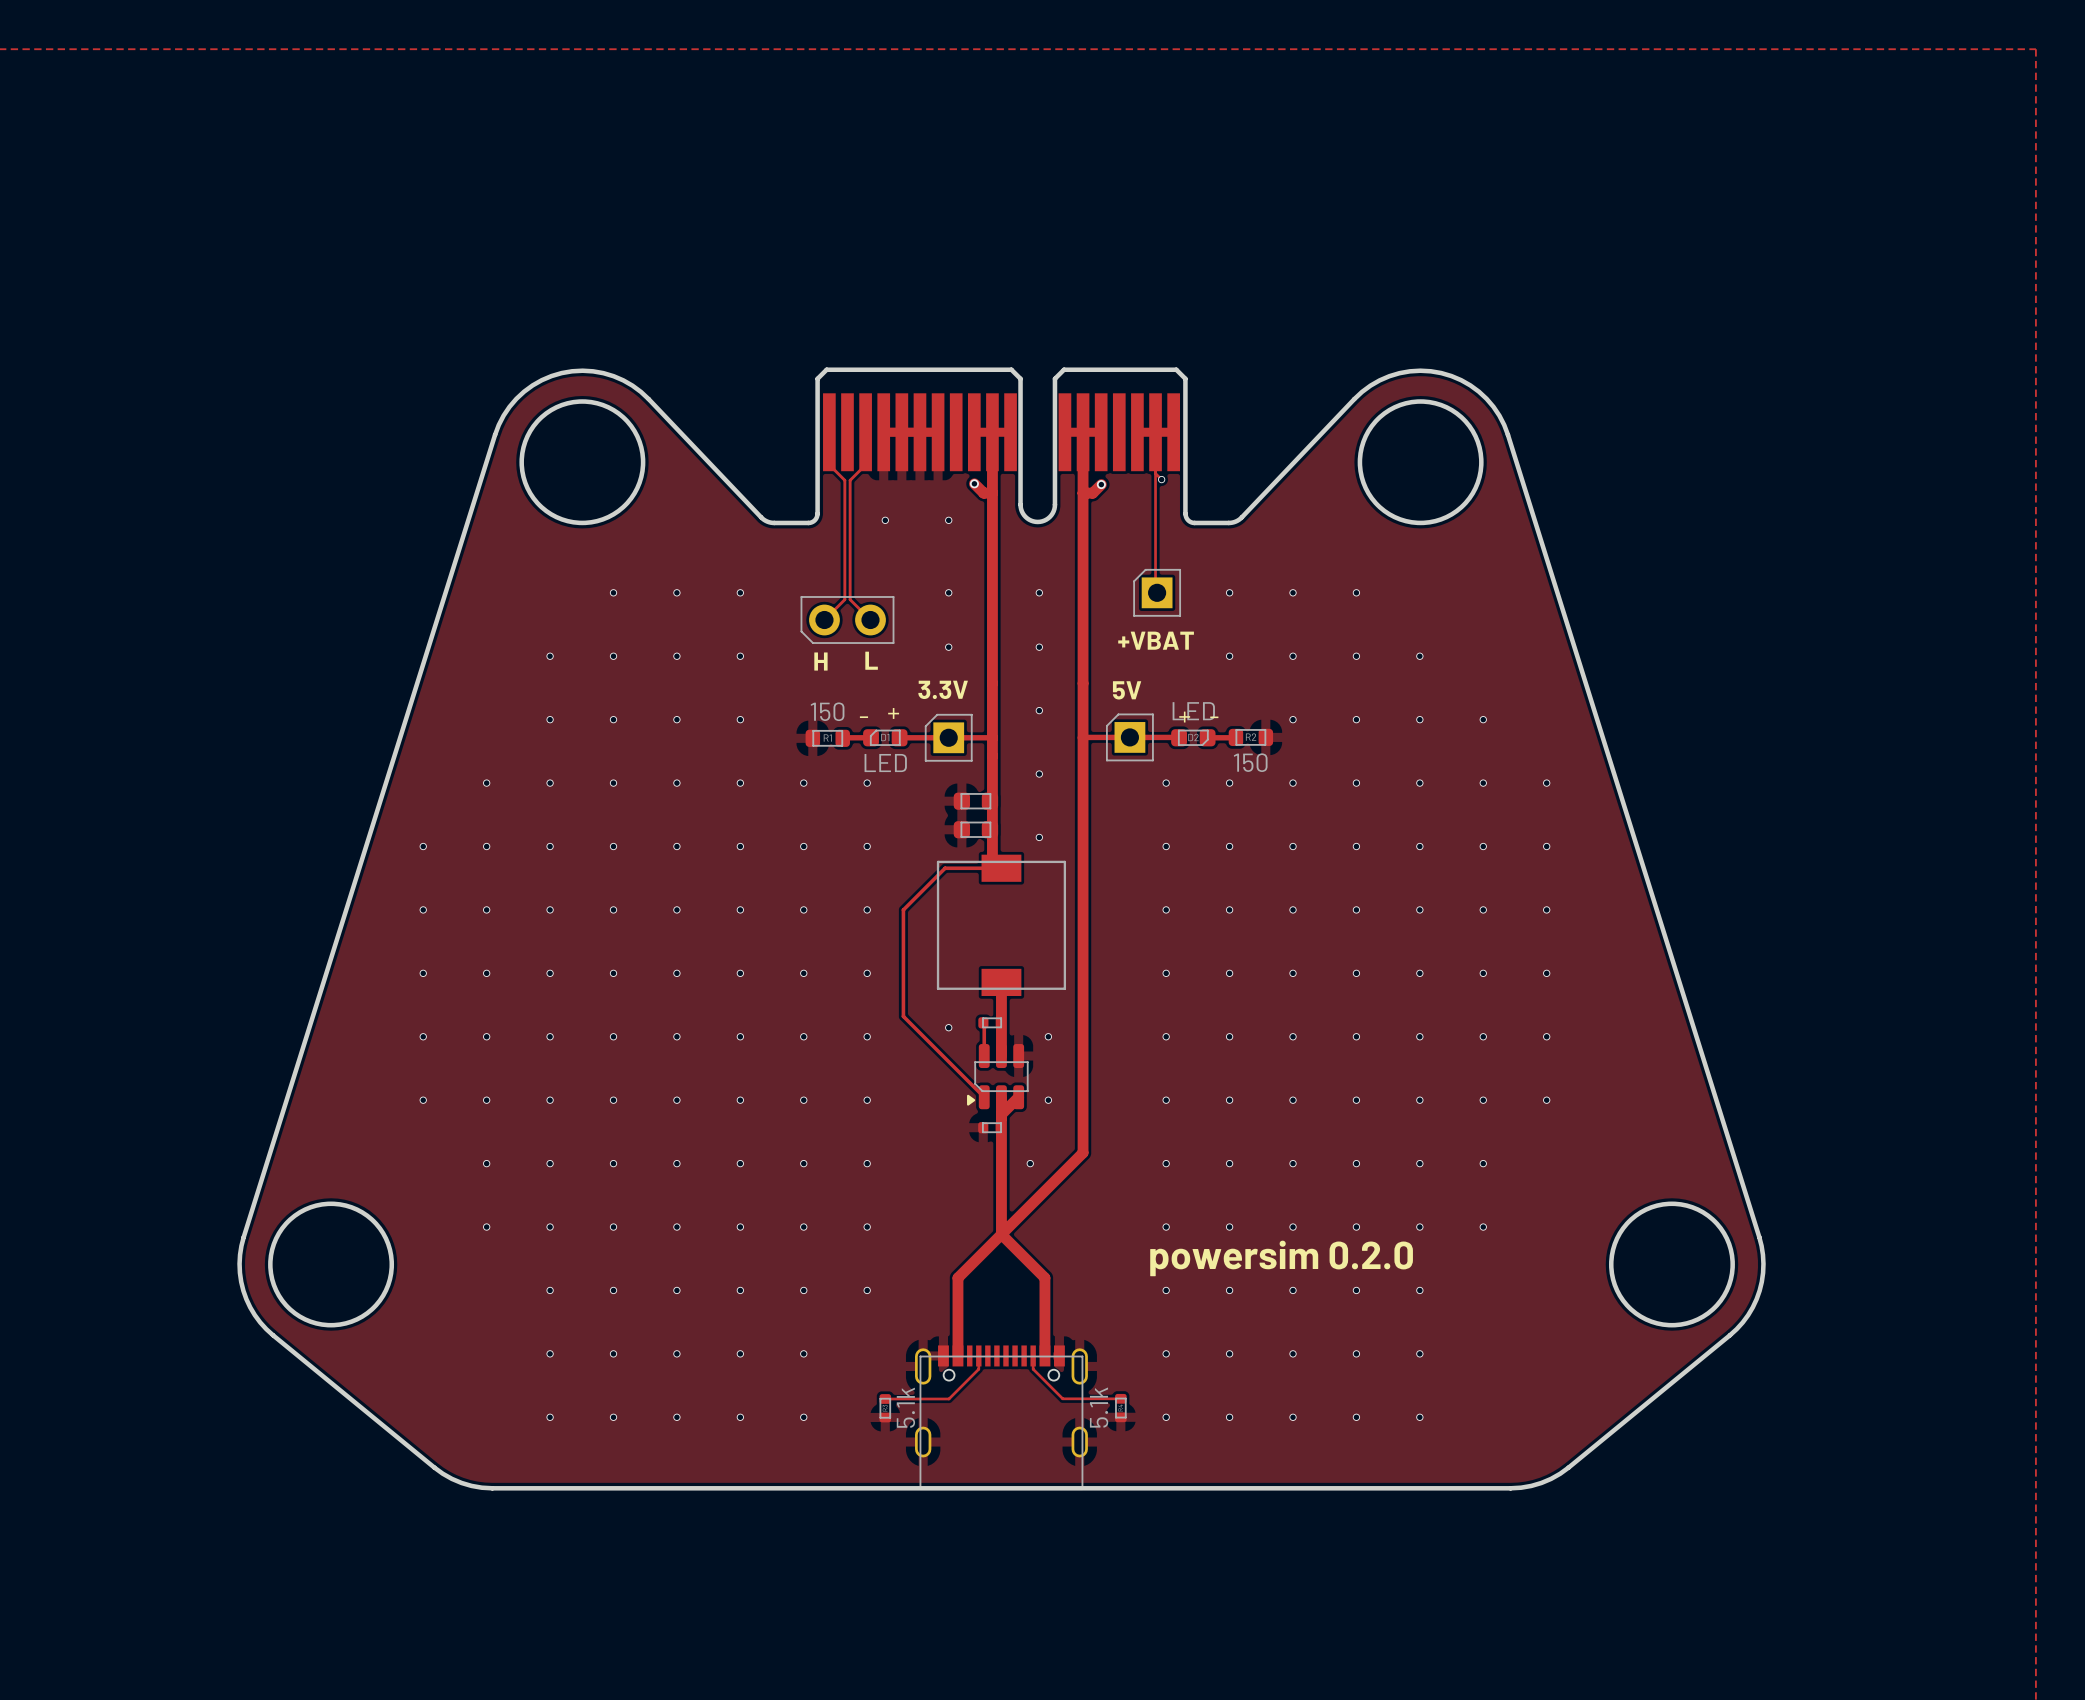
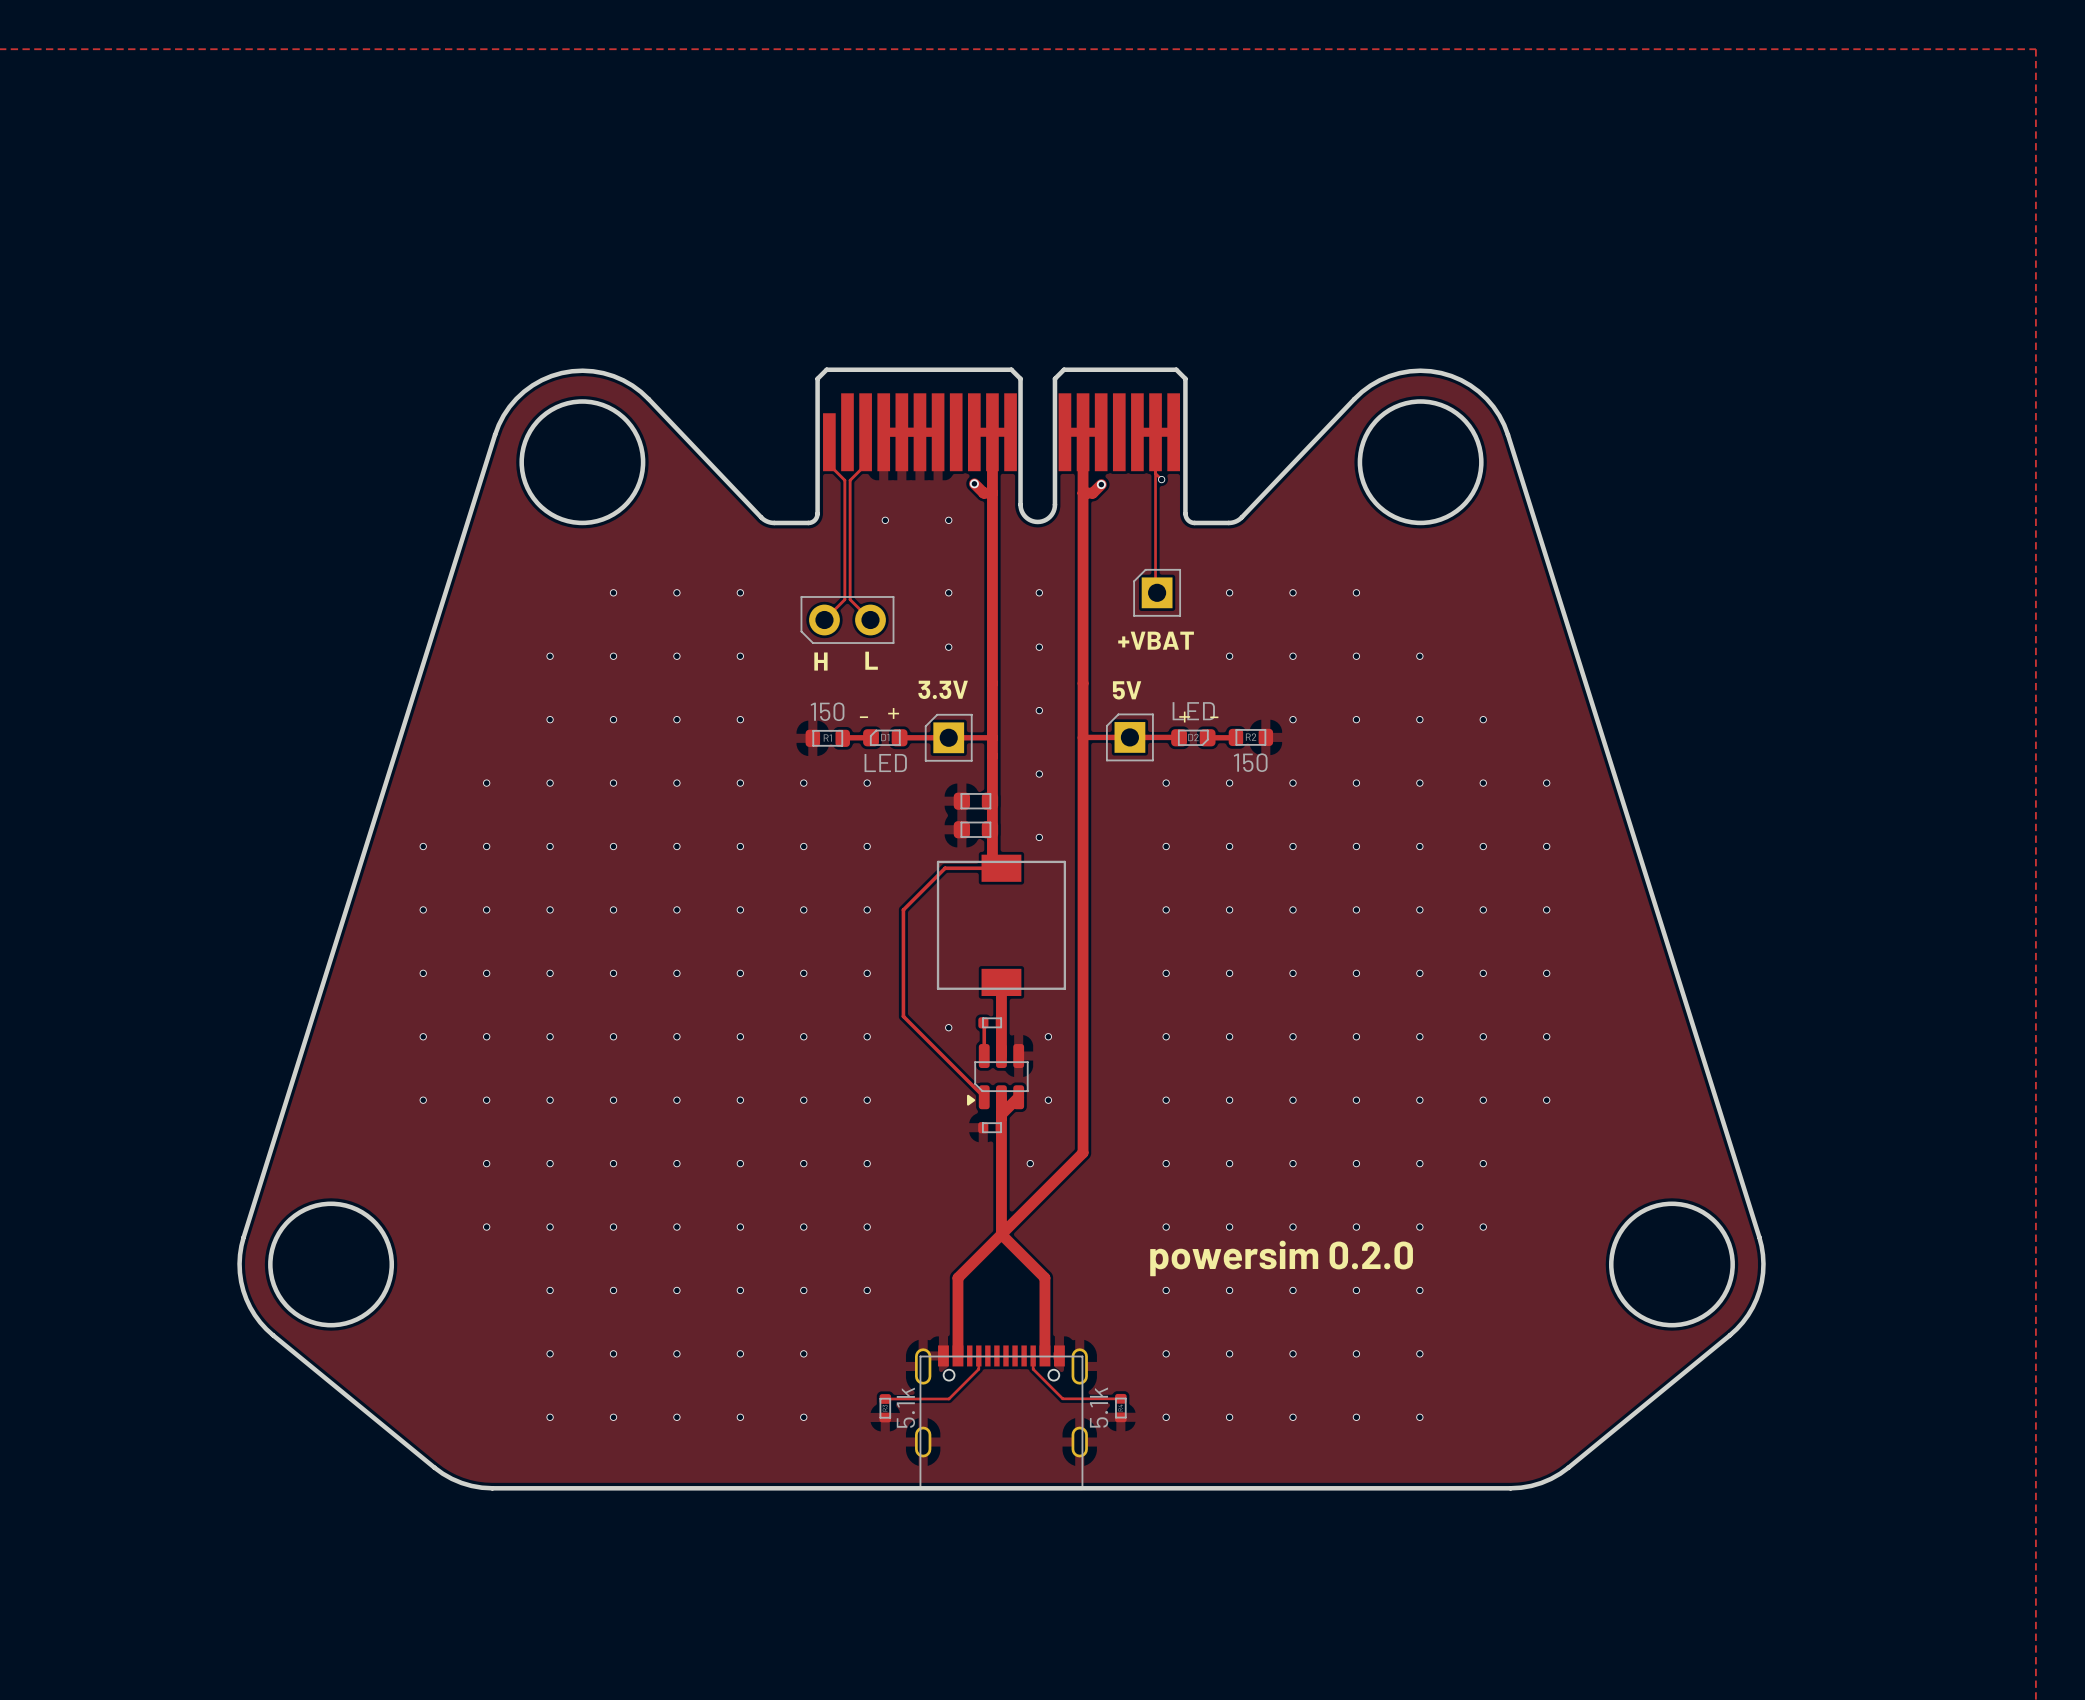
part footprint: [815, 367, 1188, 525] -> [815, 367, 1188, 525]

